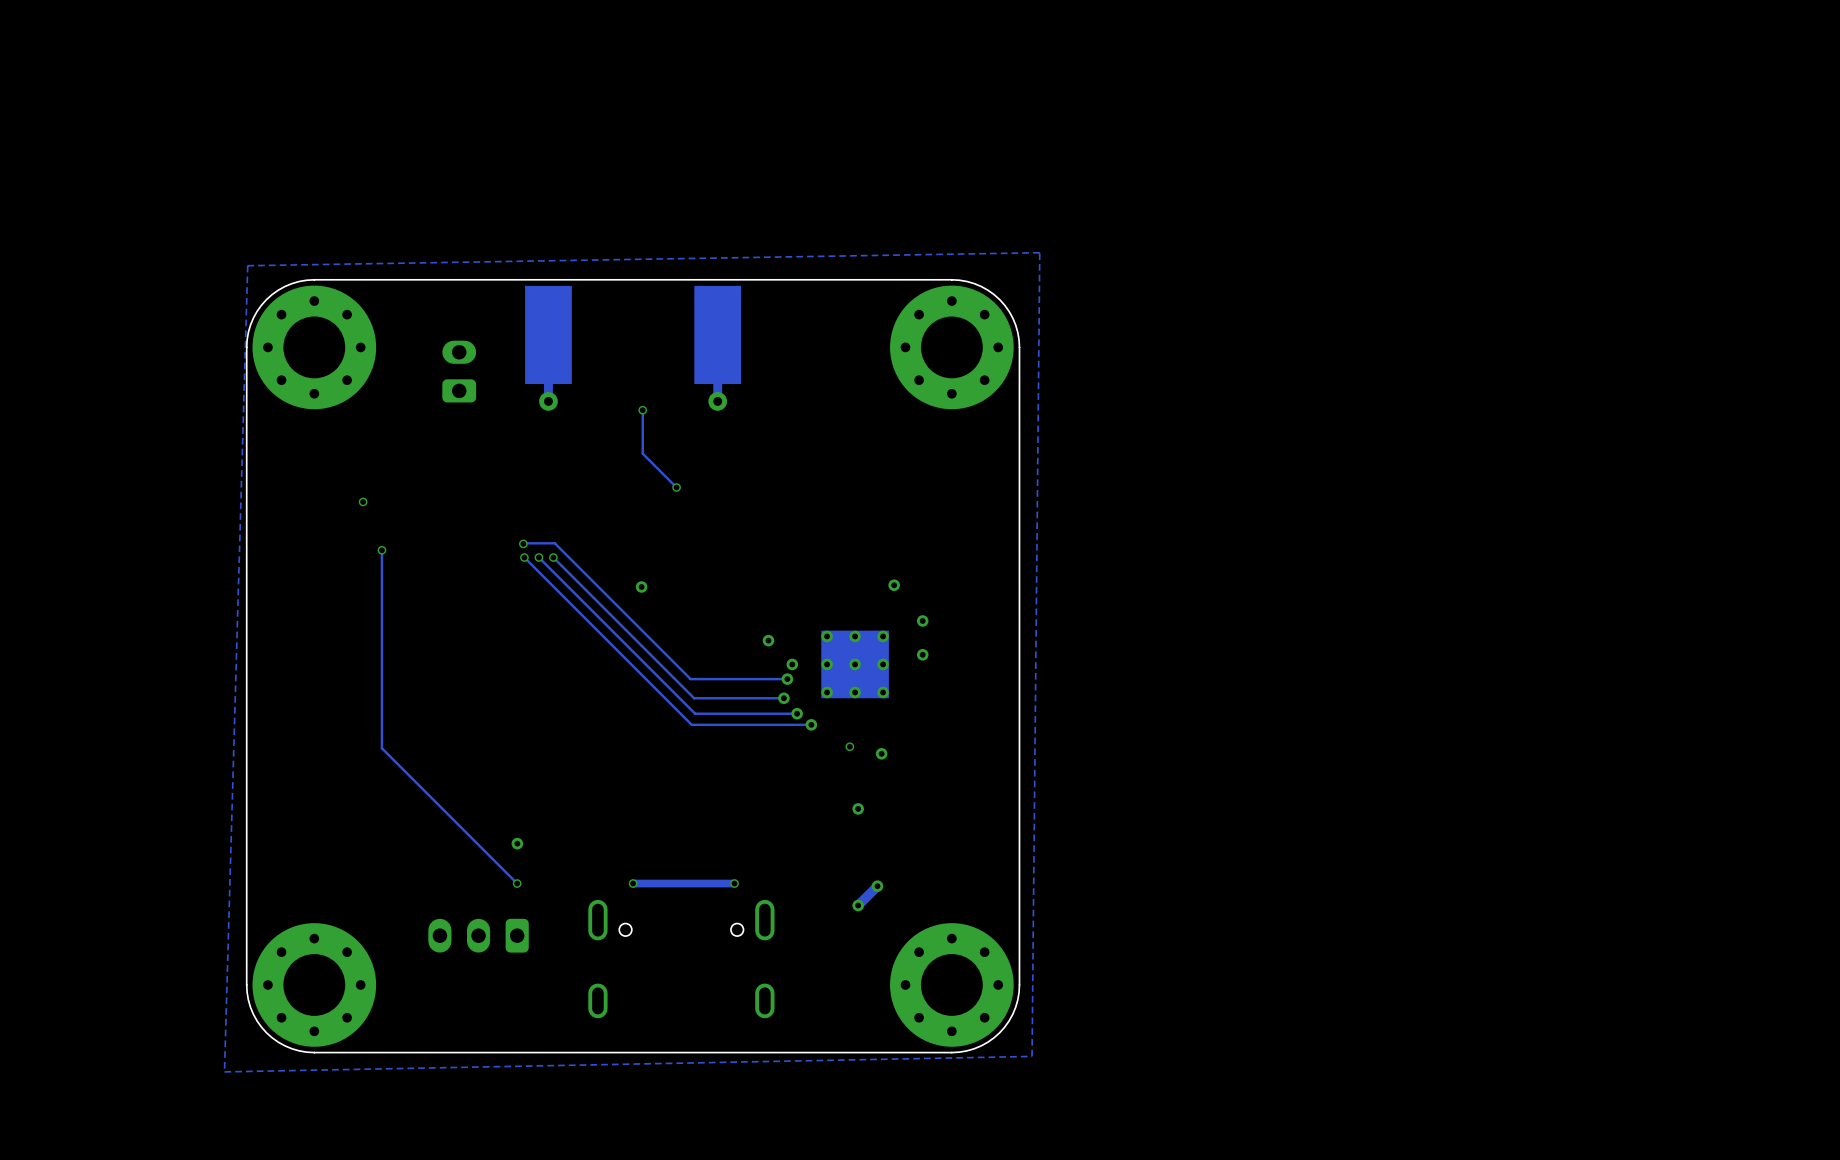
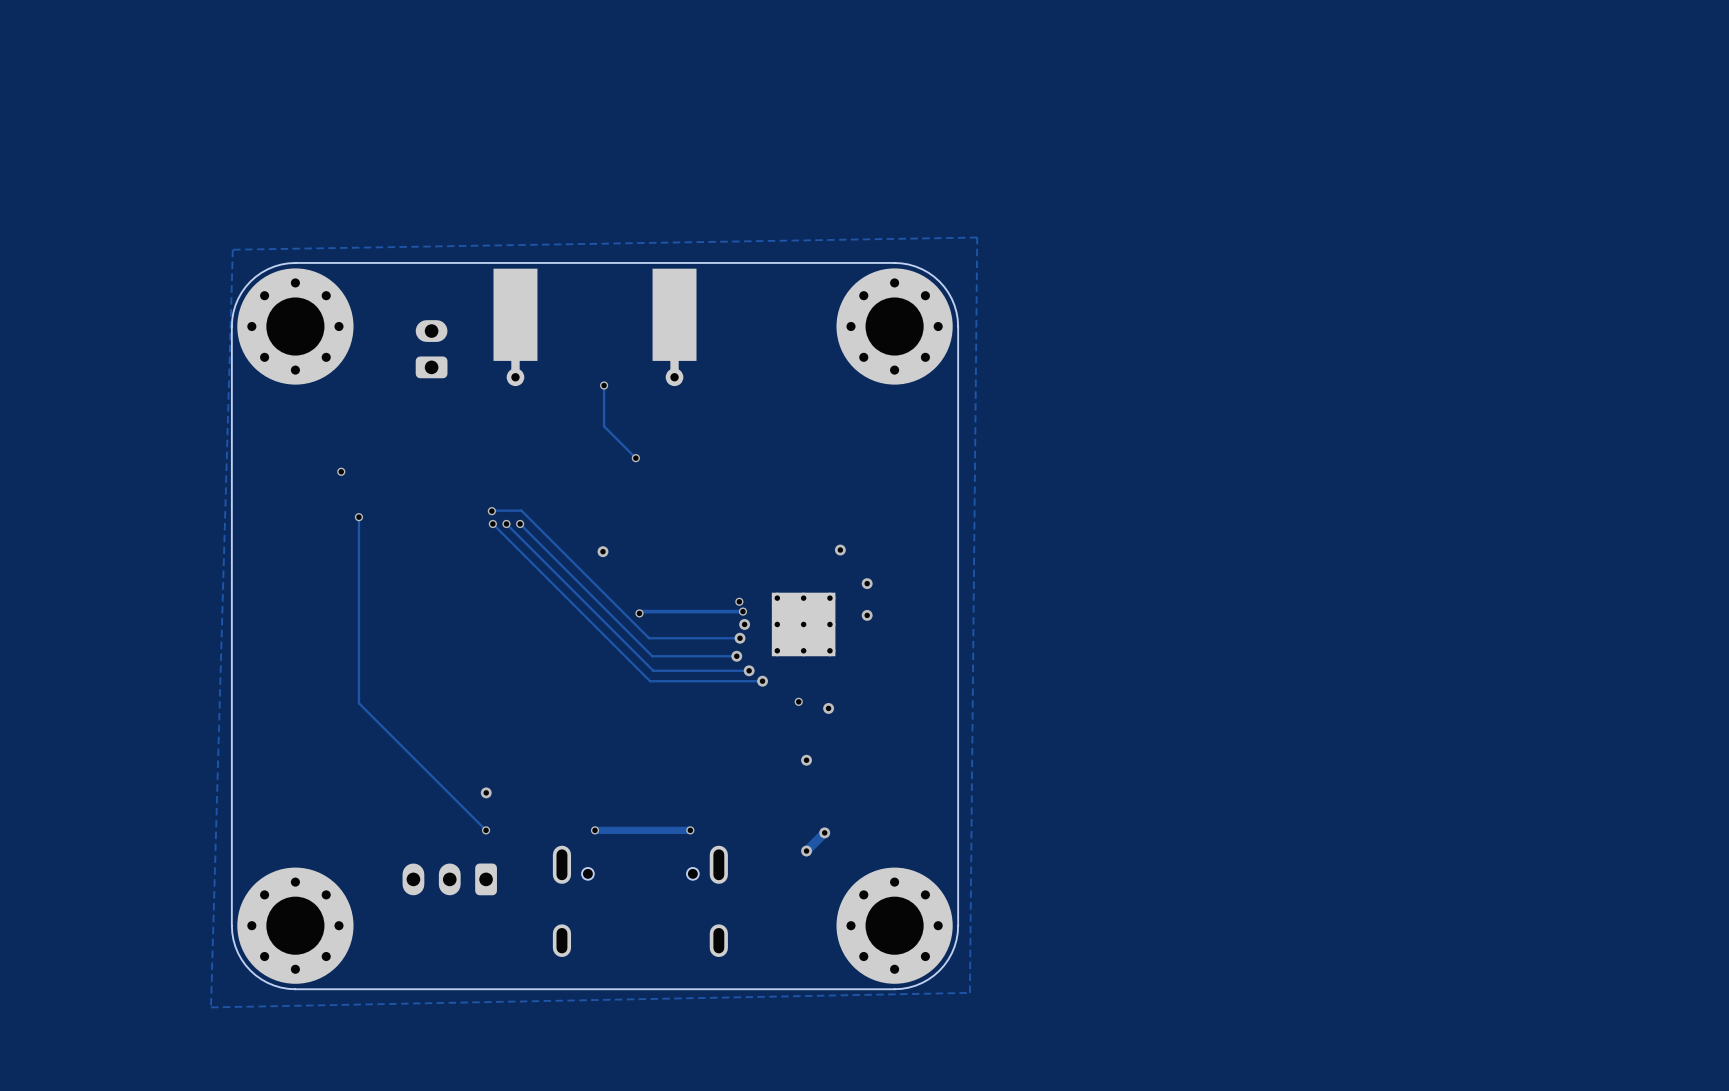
via: (768, 640) -> none
via: none -> (739, 601)
track: none -> (742, 611) (641, 611) (639, 613)
via: none -> (742, 611)
via: none -> (639, 613)

